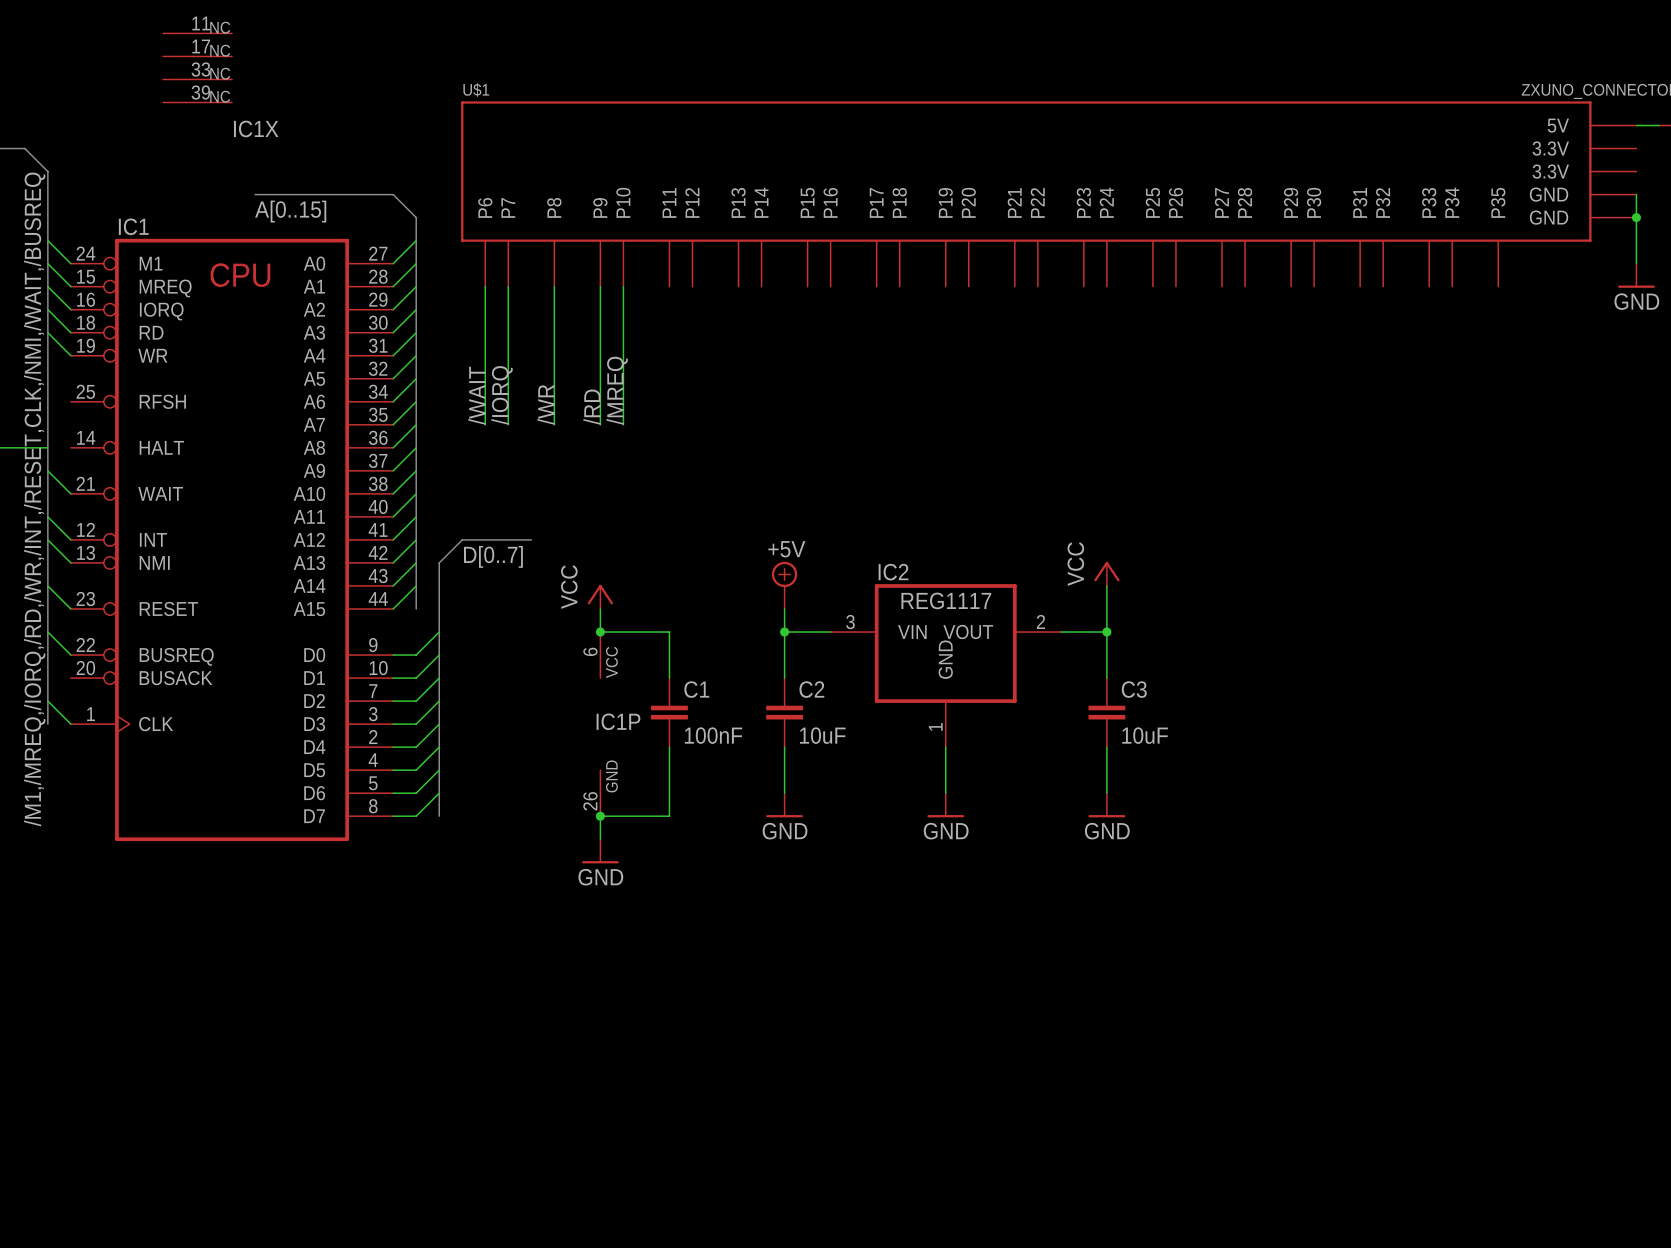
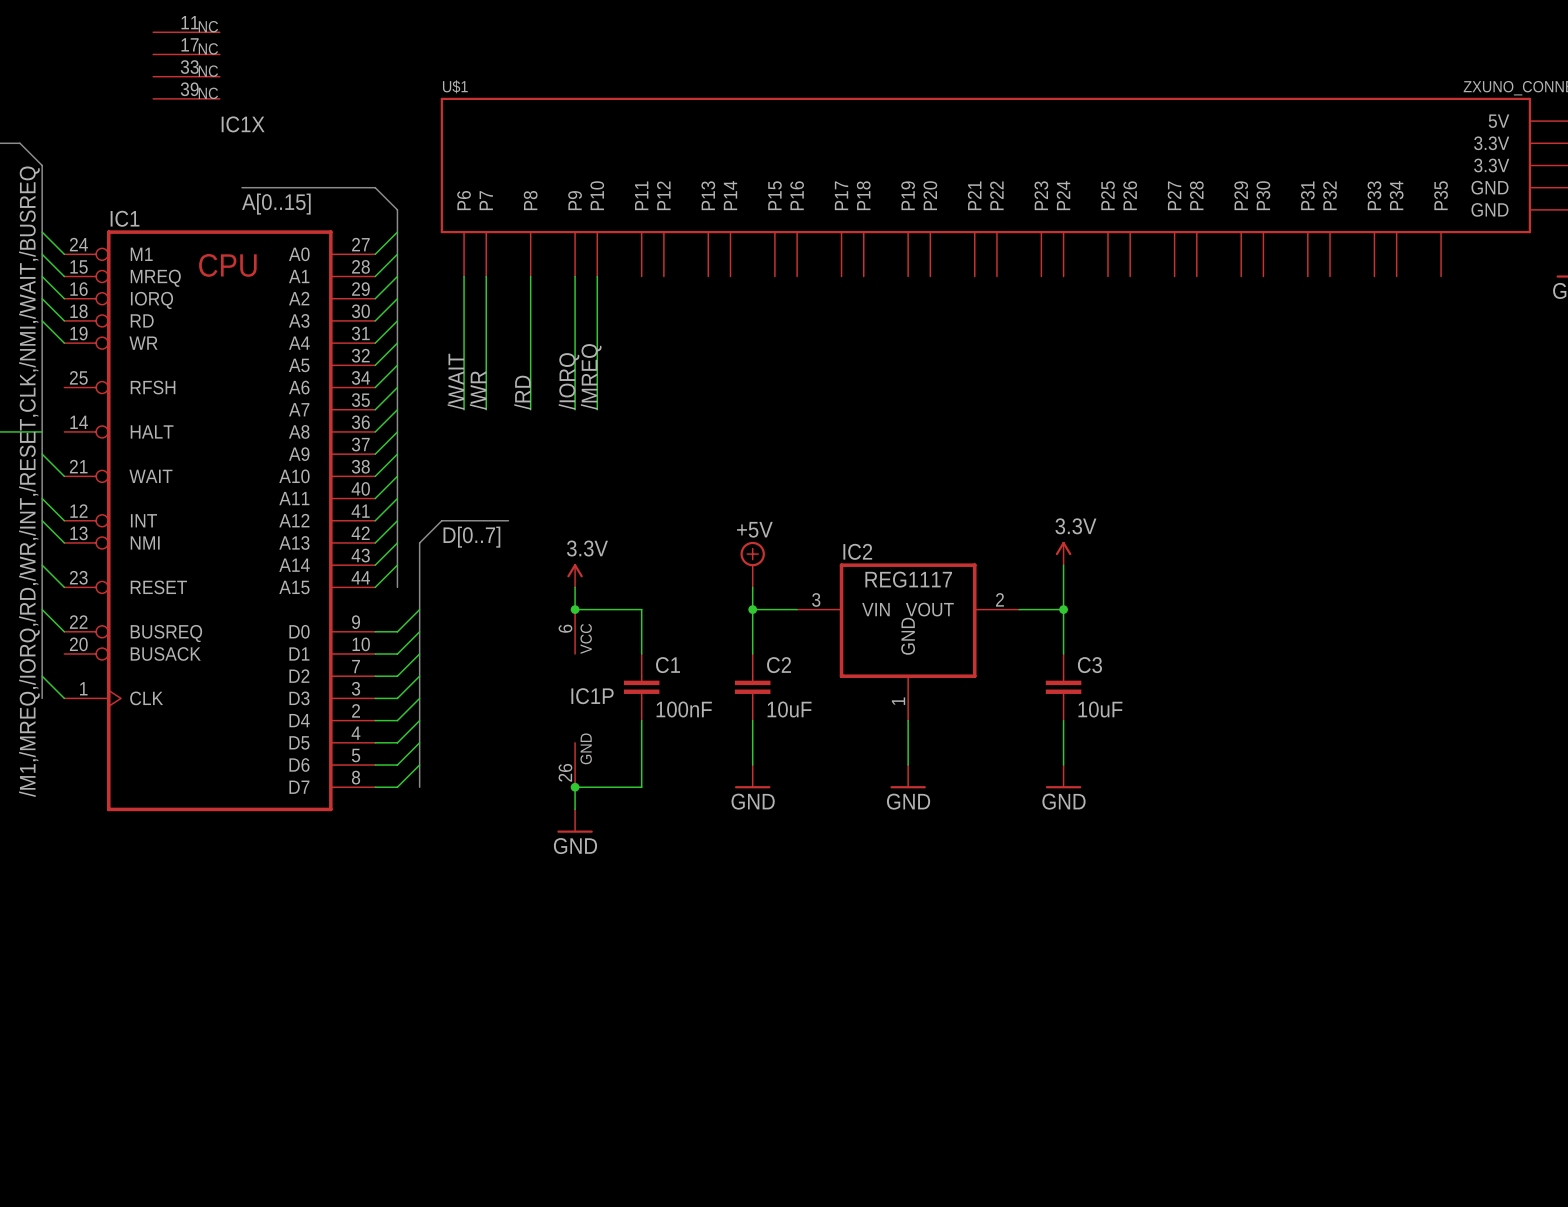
label: /IORQ (502, 395) -> /WR (478, 390)
label: /WR (545, 404) -> /RD (522, 392)
label: /RD (592, 407) -> /IORQ (569, 381)
power symbol: VCC (1106, 573) -> 3.3V (1063, 553)
power symbol: VCC (600, 596) -> 3.3V (575, 575)

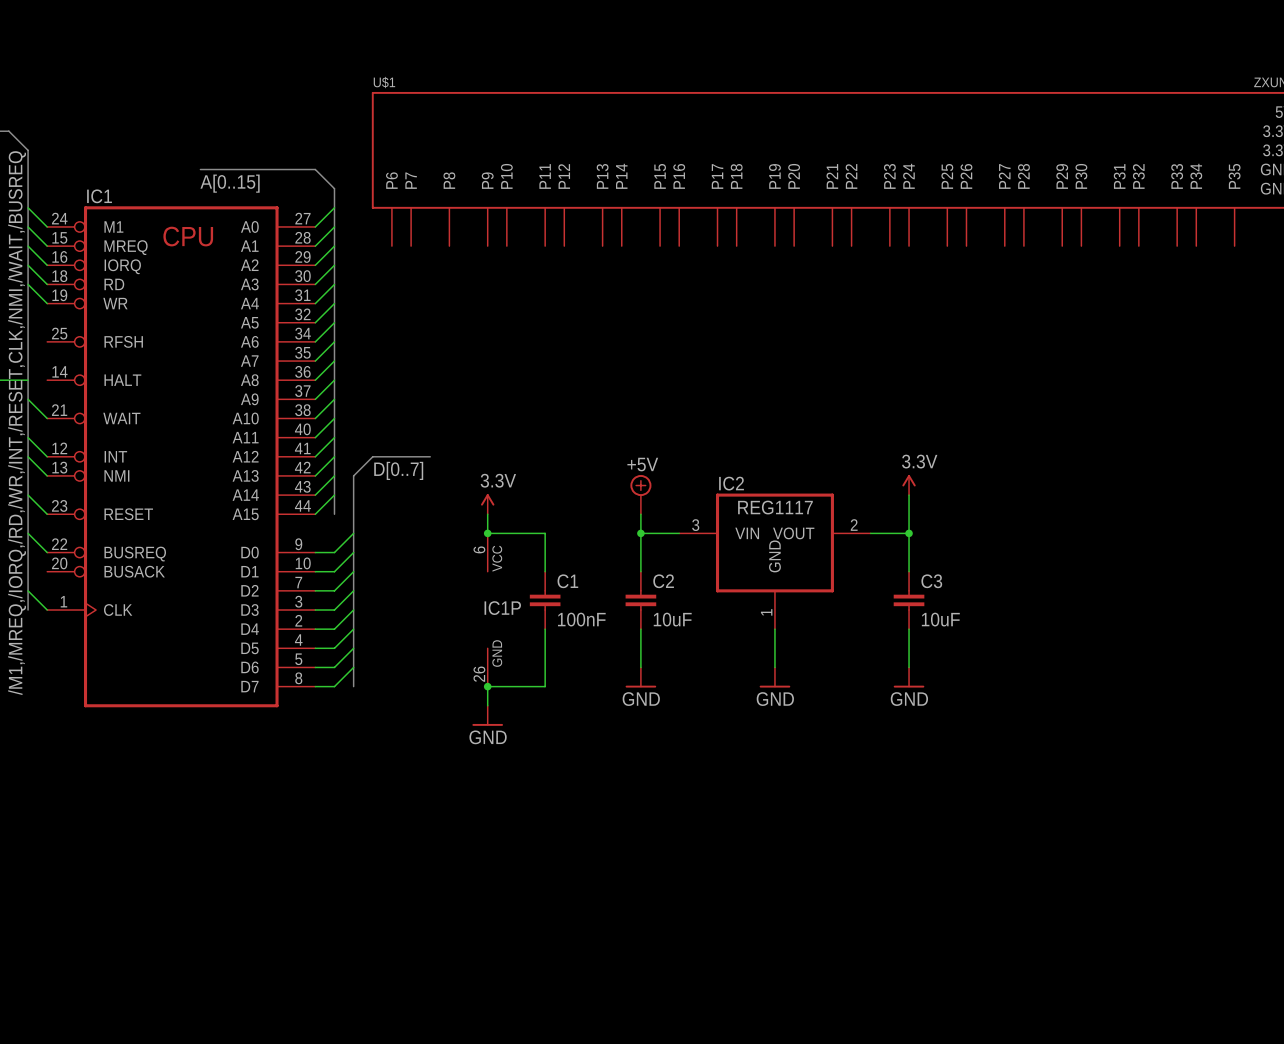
IC1X: (186, 65) -> none
wire: (464, 276) (464, 409) -> none
wire: (486, 276) (486, 409) -> none
wire: (530, 276) (530, 409) -> none
wire: (575, 276) (575, 409) -> none
wire: (597, 276) (597, 409) -> none
label: /MREQ (591, 376) -> none
label: /WAIT (455, 381) -> none
label: /IORQ (569, 381) -> none
label: /WR (478, 390) -> none
label: /RD (522, 392) -> none

